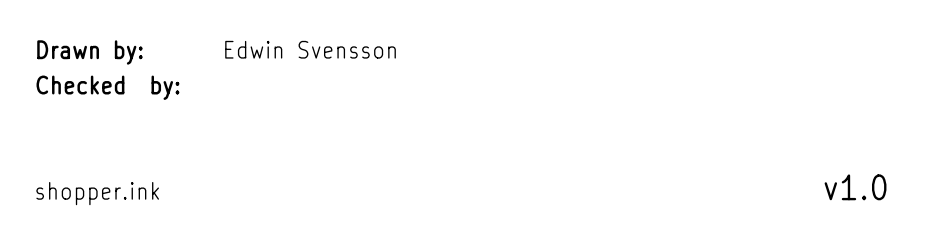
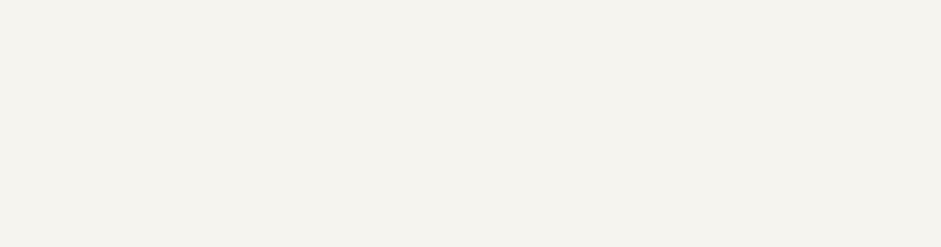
text: Edwin Svensson (310, 49) -> none
text: Drawn by: (89, 52) -> none
text: Checked by: (107, 87) -> none
text: v1.0 (855, 187) -> none
text: shopper.ink (97, 193) -> none

